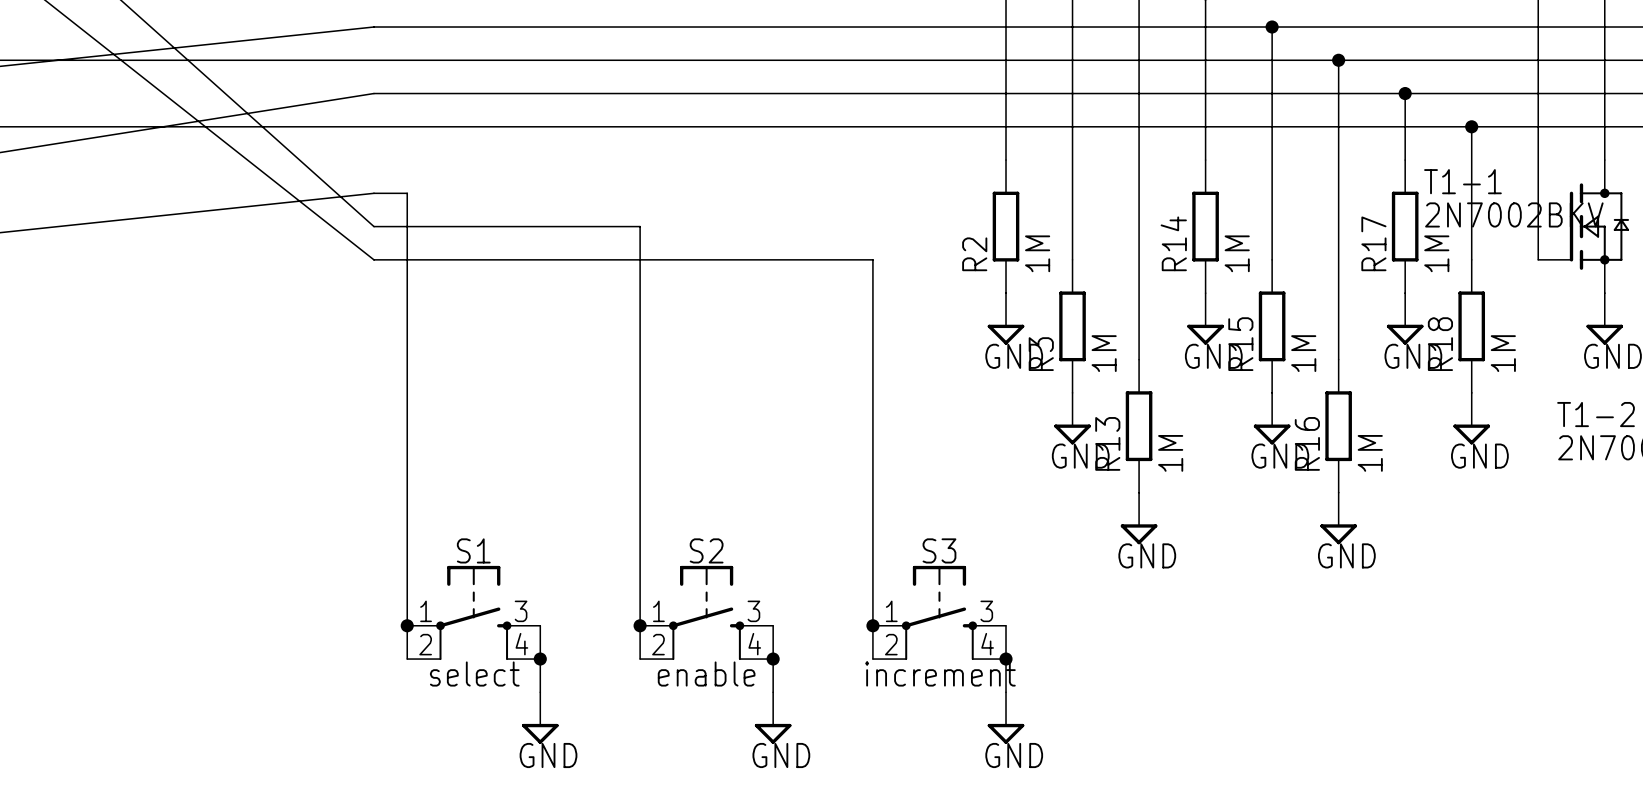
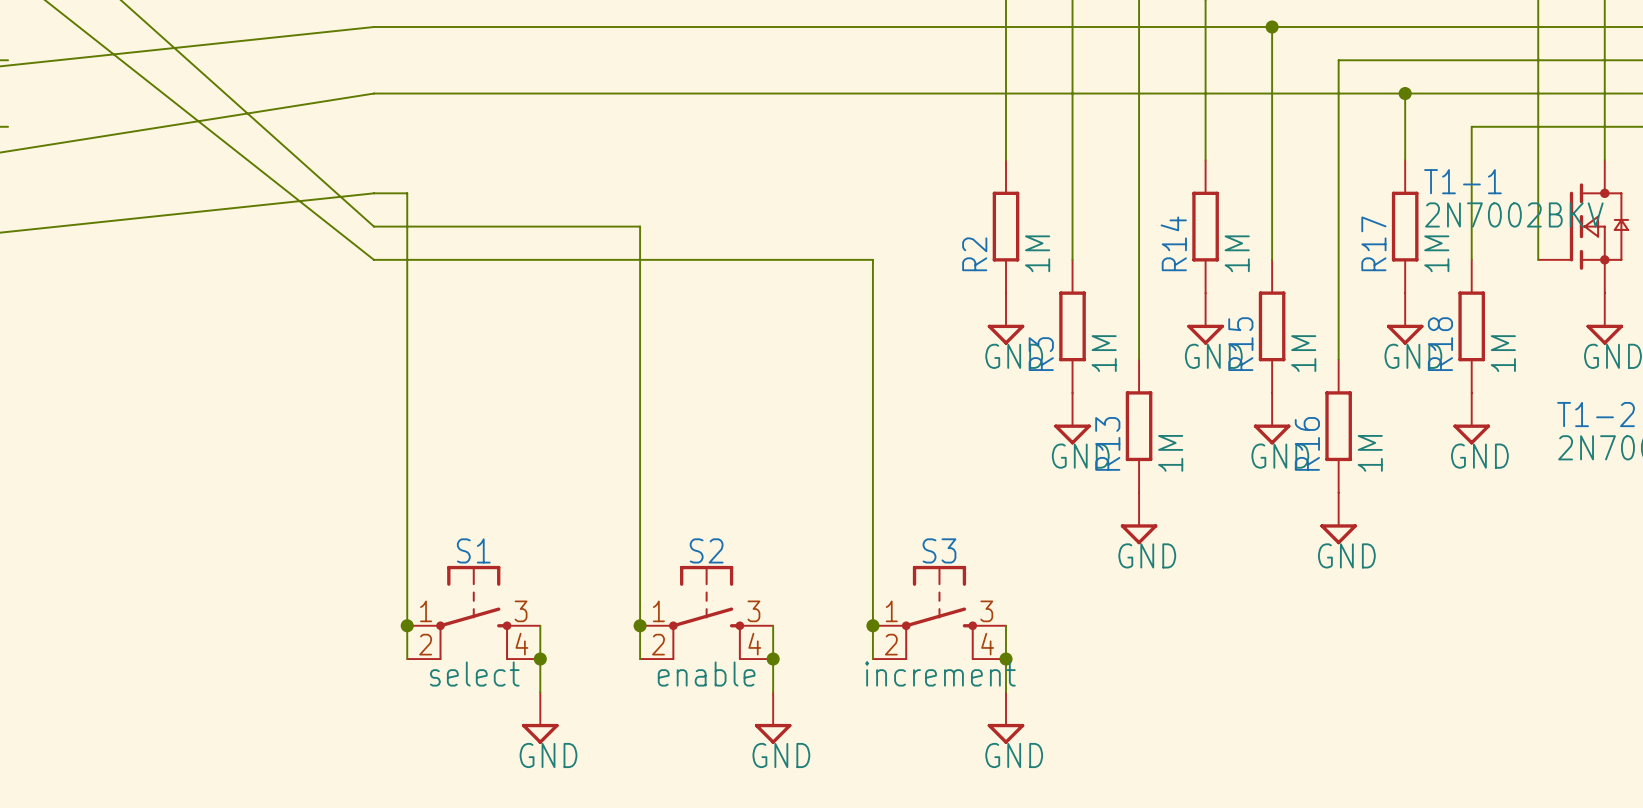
wire: (8, 60) (1338, 60) -> none
junction: (1338, 60) -> none
wire: (8, 126) (1471, 126) -> none
junction: (1471, 126) -> none

